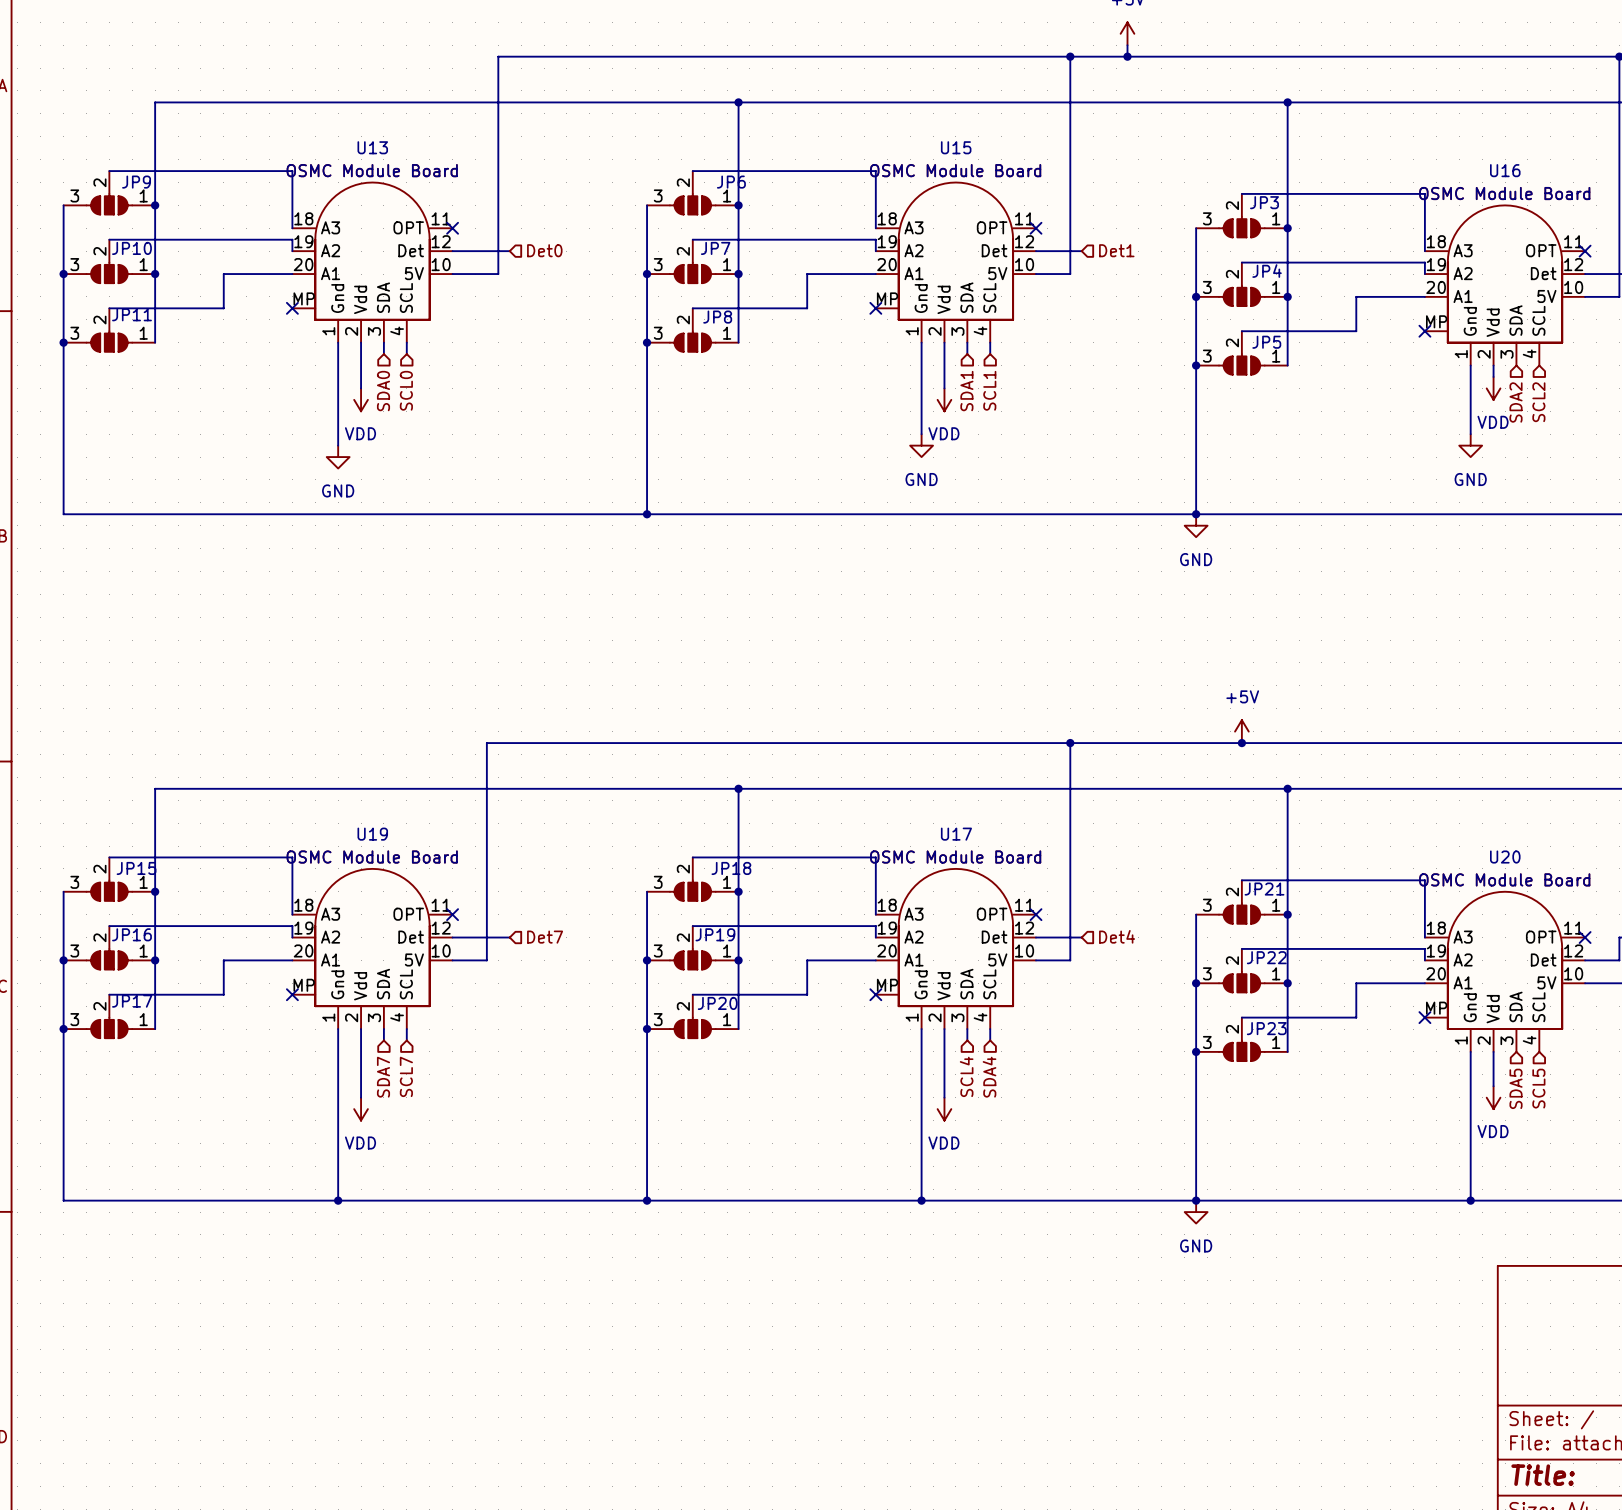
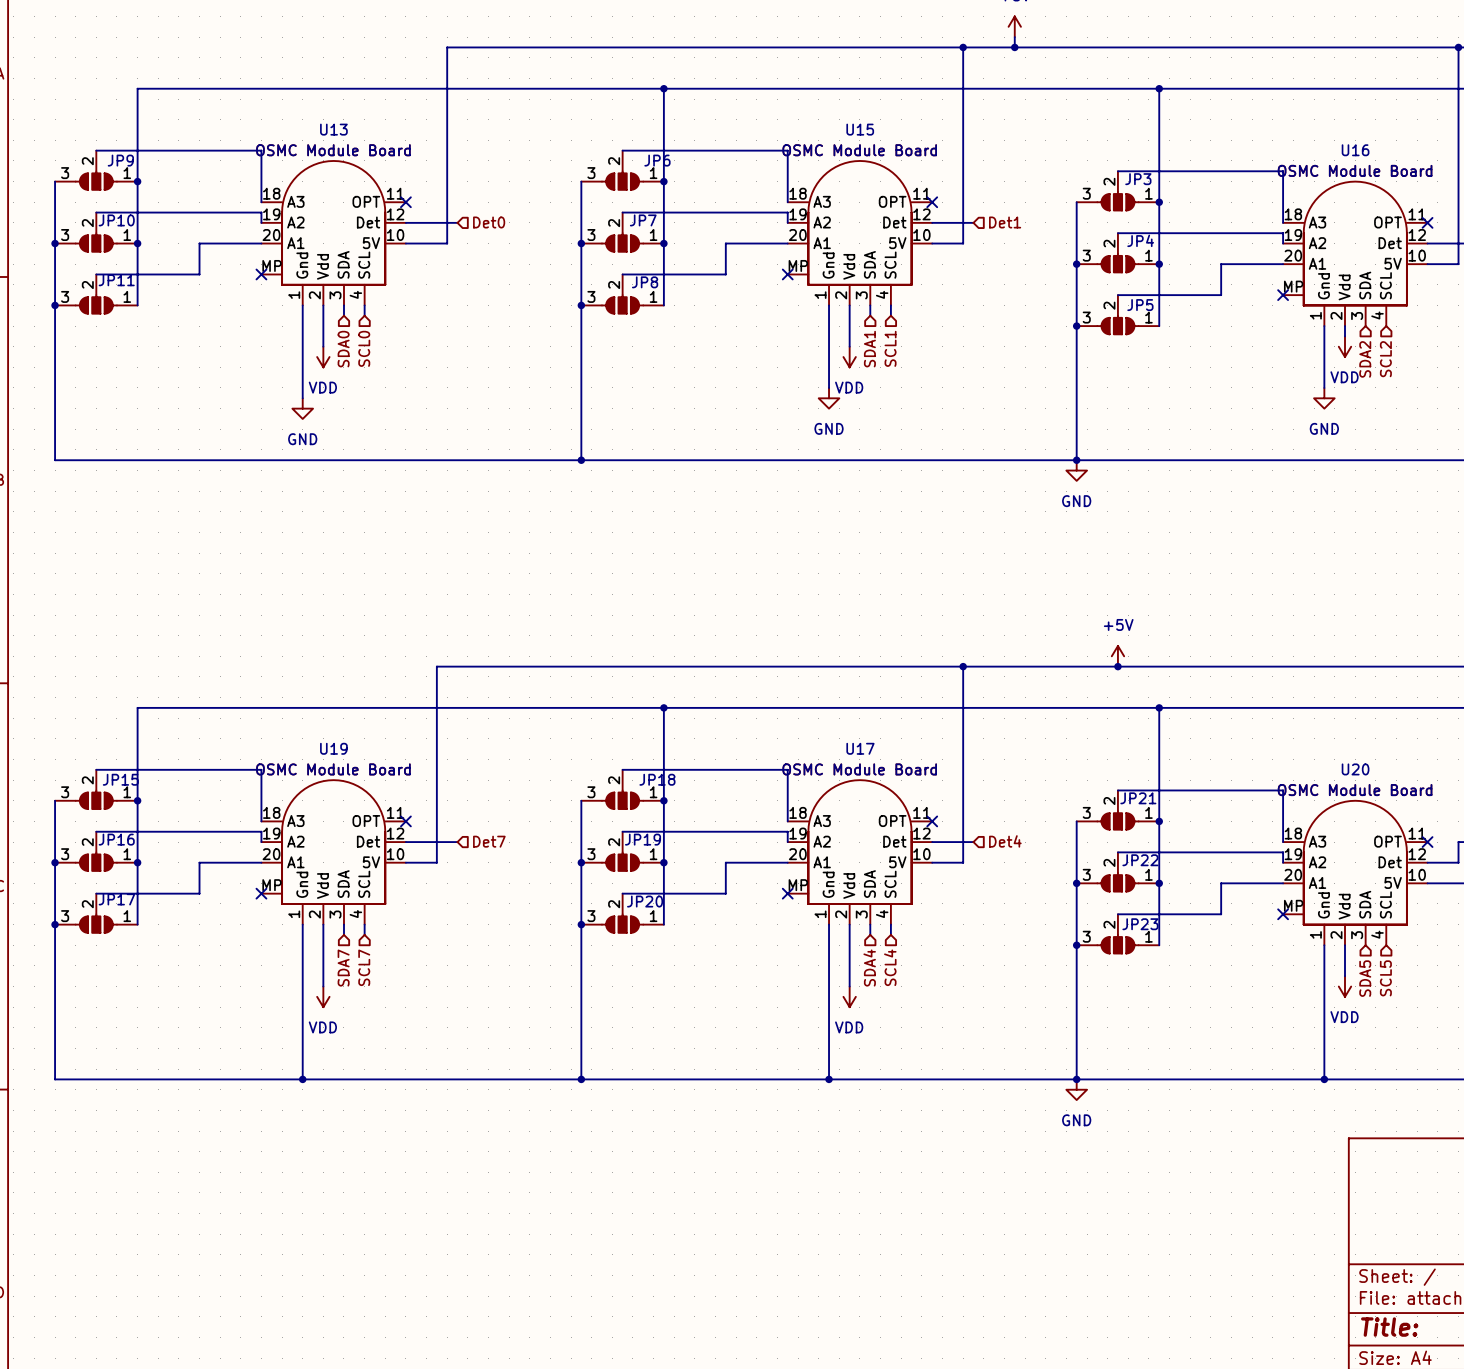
hierarchical label: SCL4 (966, 1076) -> SDA4 (869, 968)
hierarchical label: SDA4 (989, 1077) -> SCL4 (890, 967)

